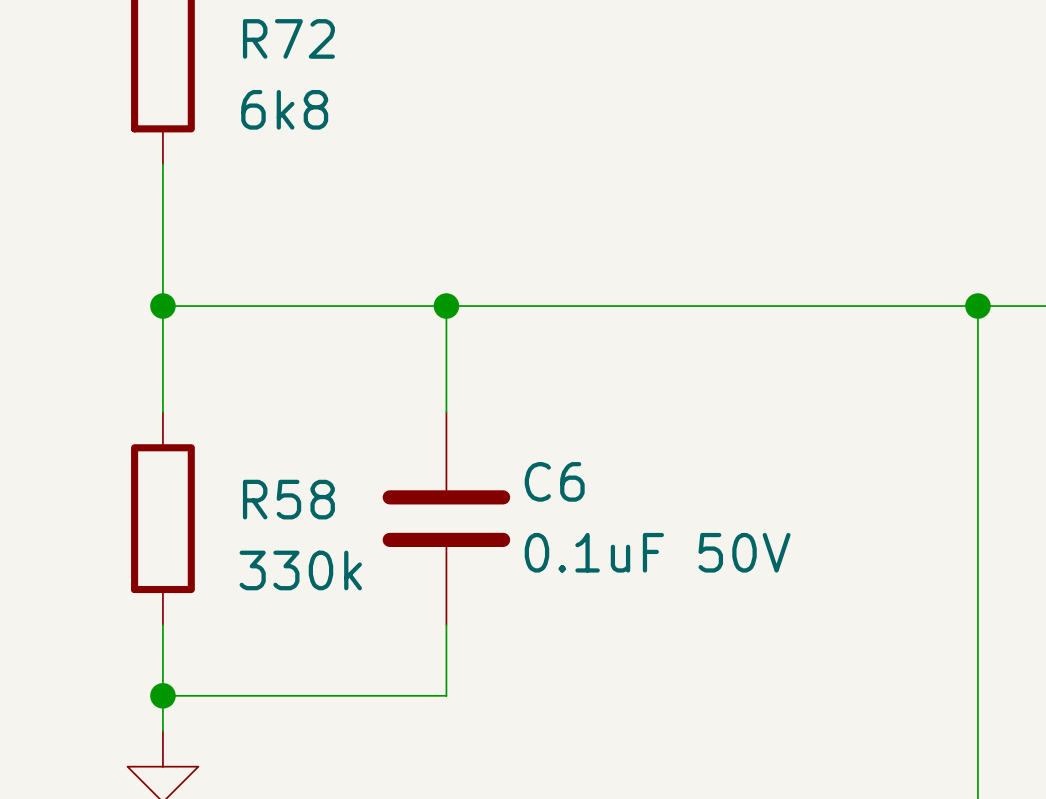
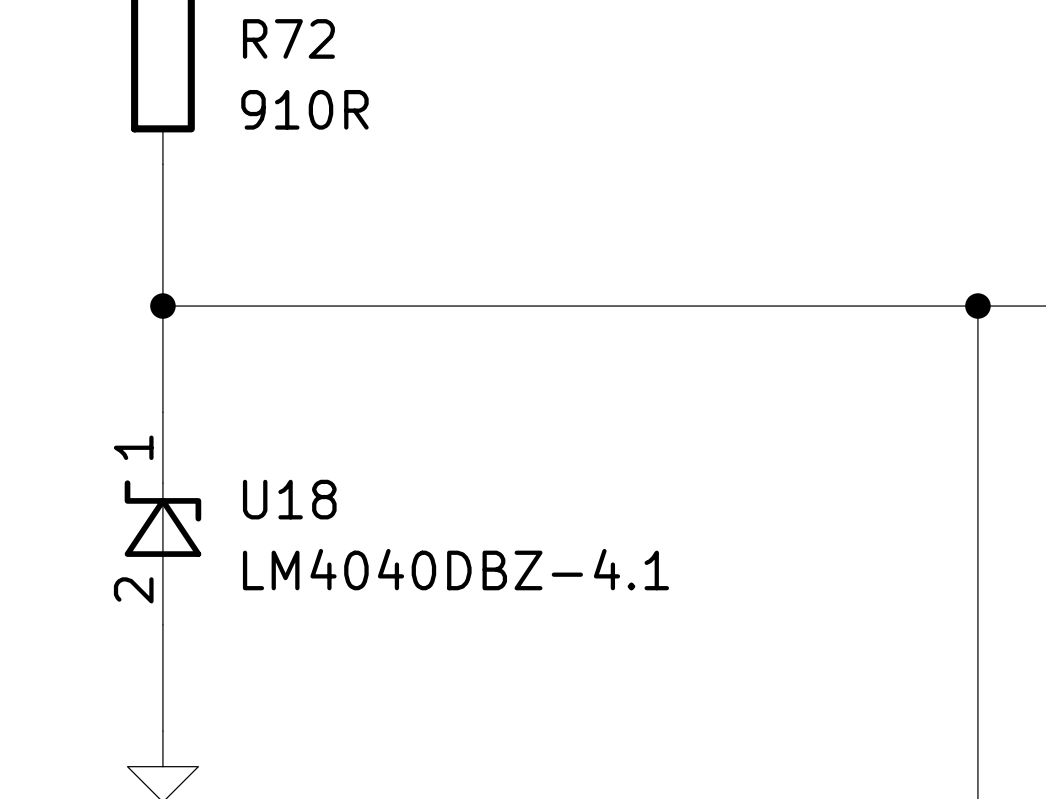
R72 value: 6k8 (284, 109) -> 910R (304, 109)
wire: (446, 306) (446, 412) -> none
junction: (446, 306) -> none
R58: 330k (162, 518) -> none
U18: none -> LM4040DBZ-4.1 (162, 518)
C6: 0.1uF 50V (446, 518) -> none
wire: (446, 624) (446, 695) (162, 695) -> none
junction: (162, 695) -> none

